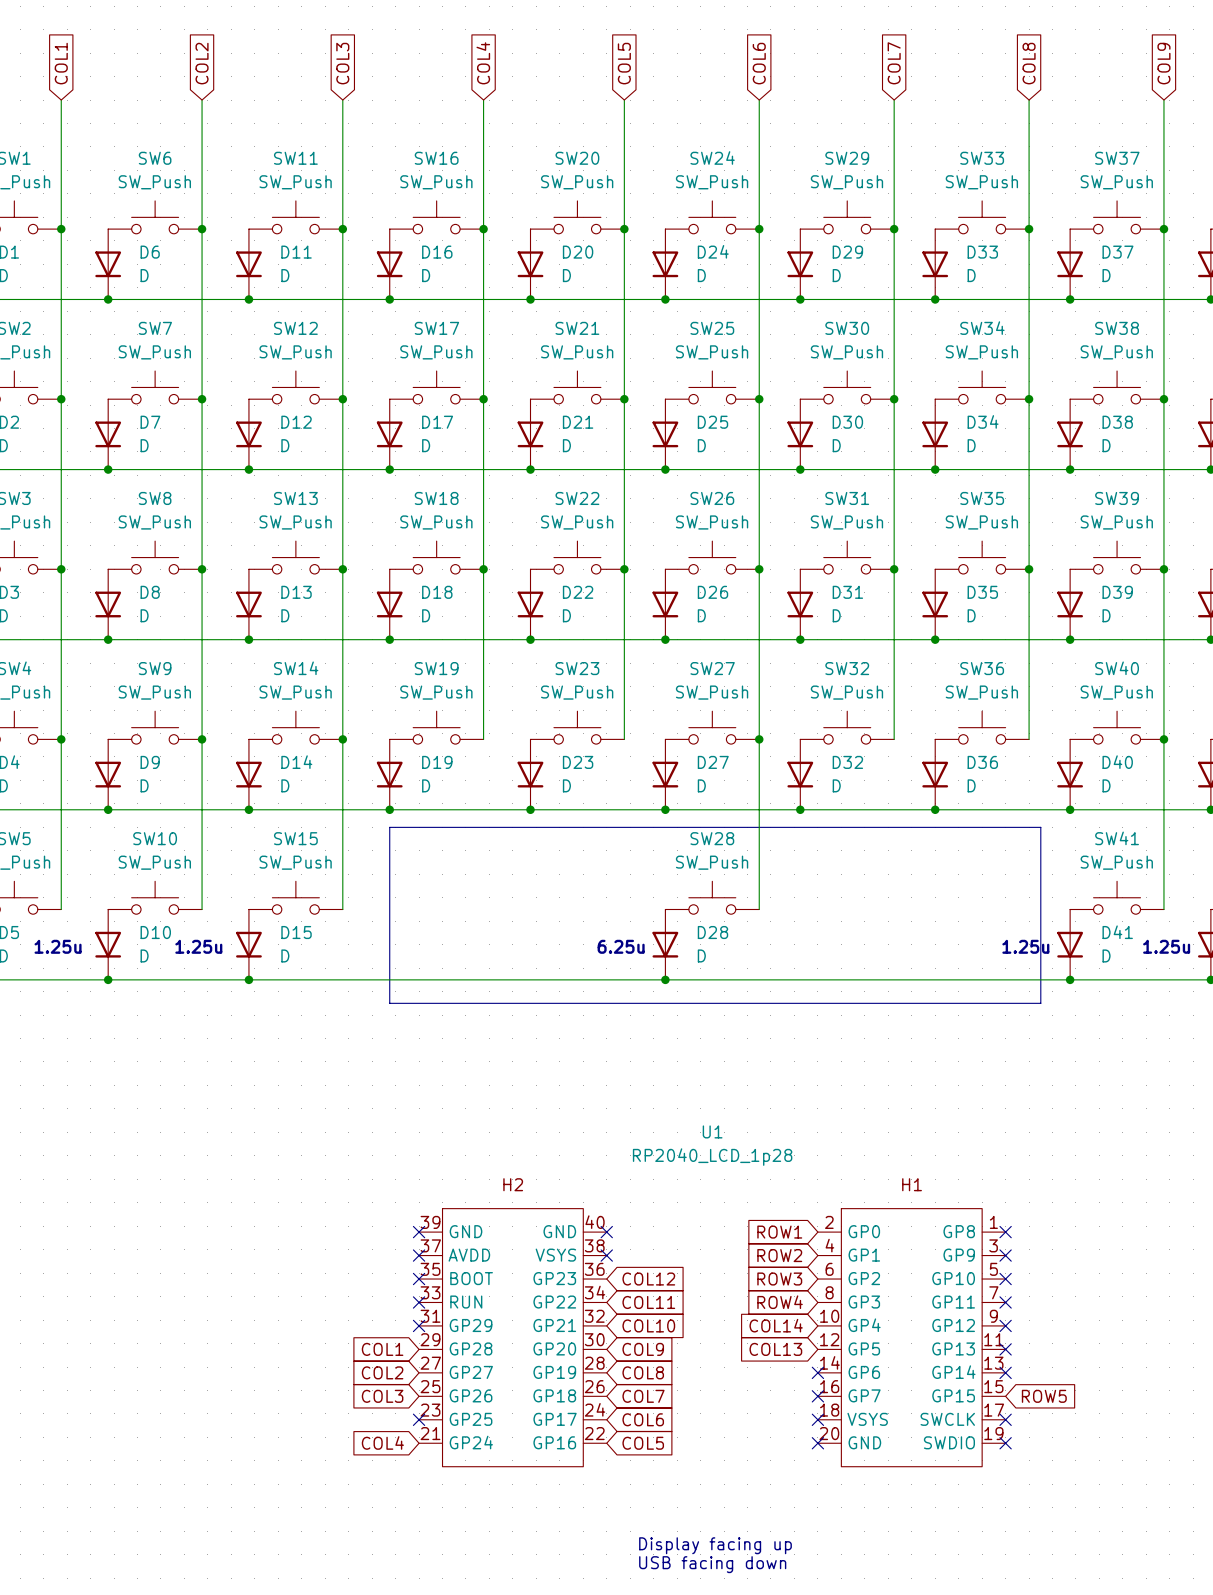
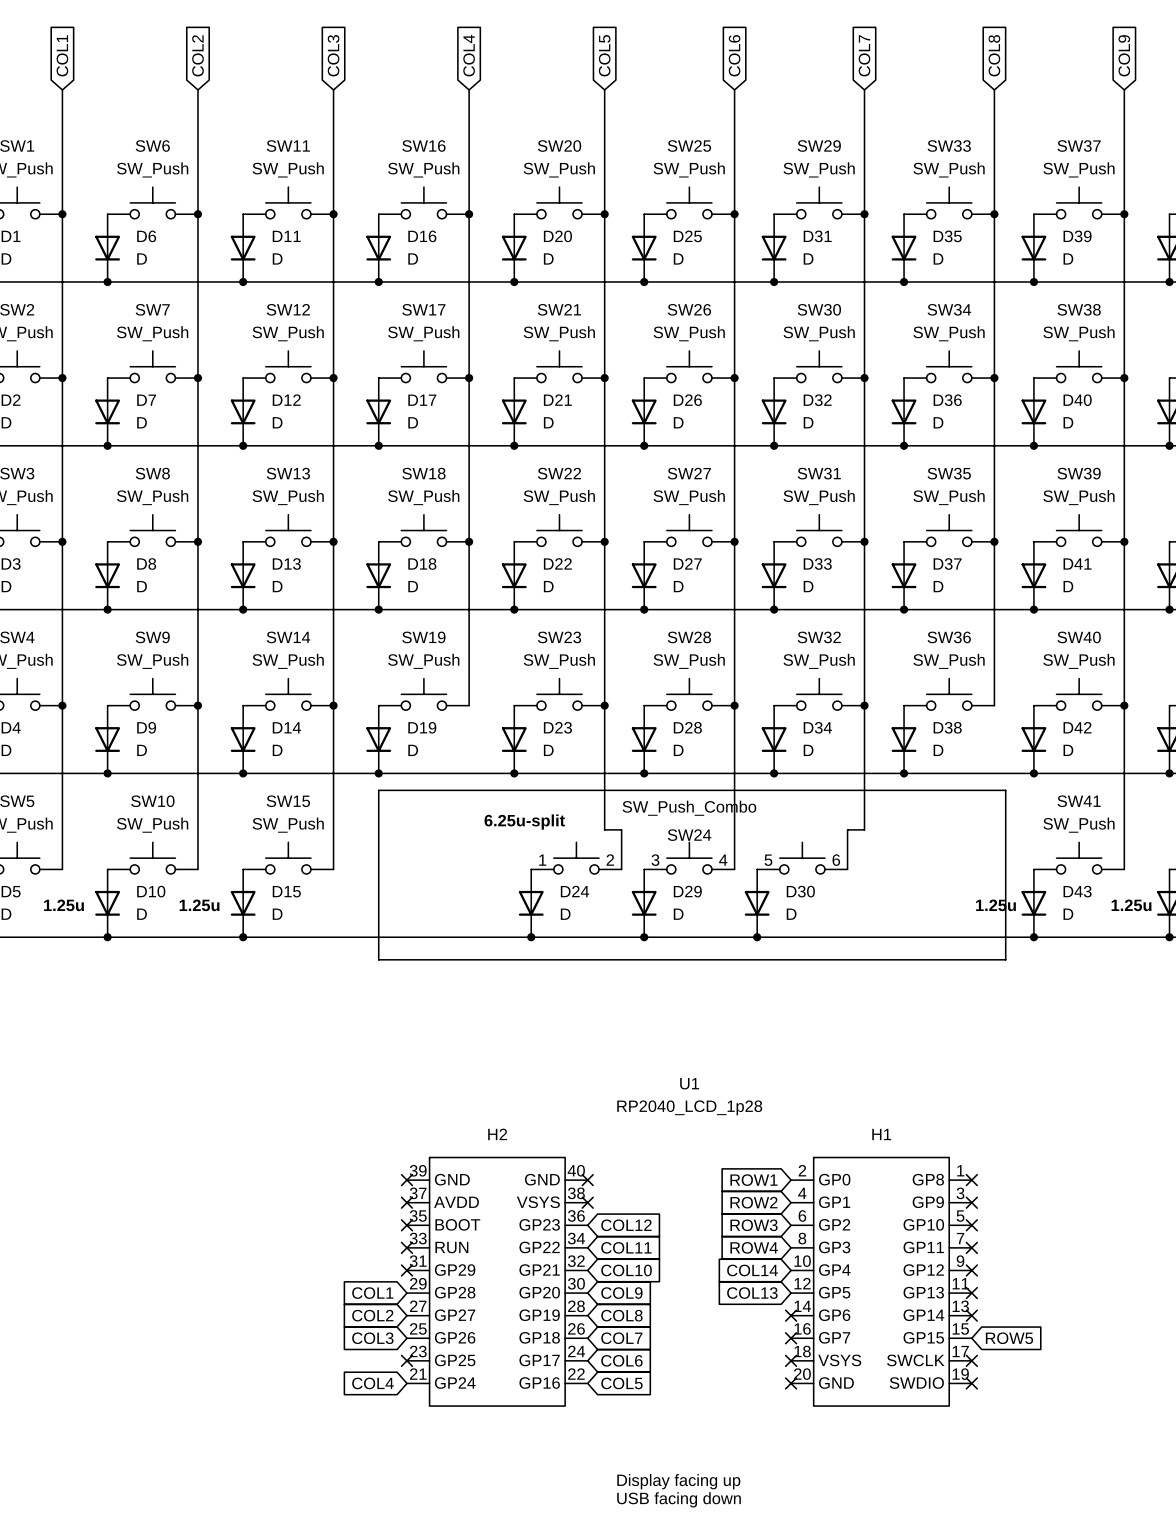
SW24 name: SW24 (712, 157) -> SW25 (689, 146)
D24 name: D24 (713, 251) -> D25 (687, 236)
D29 name: D29 (847, 252) -> D31 (817, 236)
D33 name: D33 (982, 252) -> D35 (947, 236)
D37 name: D37 (1117, 252) -> D39 (1077, 236)
SW25 name: SW25 (712, 328) -> SW26 (689, 309)
D34 name: D34 (983, 421) -> D36 (947, 400)
D25 name: D25 (712, 422) -> D26 (687, 400)
D30 name: D30 (847, 422) -> D32 (817, 400)
D38 name: D38 (1117, 422) -> D40 (1077, 400)
SW26 name: SW26 (712, 498) -> SW27 (689, 473)
D26 name: D26 (712, 592) -> D27 (687, 563)
D31 name: D31 (847, 592) -> D33 (817, 564)
D35 name: D35 (982, 592) -> D37 (947, 564)
D39 name: D39 (1117, 592) -> D41 (1077, 564)
SW27 name: SW27 (712, 668) -> SW28 (689, 637)
wire: none -> (604, 705) (604, 829) (621, 829) (621, 869)
junction: none -> (604, 705)
wire: none -> (864, 705) (864, 829) (847, 829) (847, 869)
junction: none -> (864, 705)
D27 name: D27 (713, 762) -> D28 (687, 727)
D32 name: D32 (847, 762) -> D34 (817, 727)
D36 name: D36 (982, 762) -> D38 (947, 727)
D40 name: D40 (1117, 762) -> D42 (1077, 727)
text: none -> 6.25u-split (524, 822)
SW28: SW_Push (712, 897) -> none
SW24: none -> SW_Push_Combo (689, 858)
D28 name: D28 (712, 932) -> D29 (687, 891)
D41 name: D41 (1117, 932) -> D43 (1077, 891)
D24: none -> D (531, 903)
D30: none -> D (757, 903)
text: 6.25u (621, 946) -> none
junction: none -> (531, 937)
junction: none -> (757, 937)

